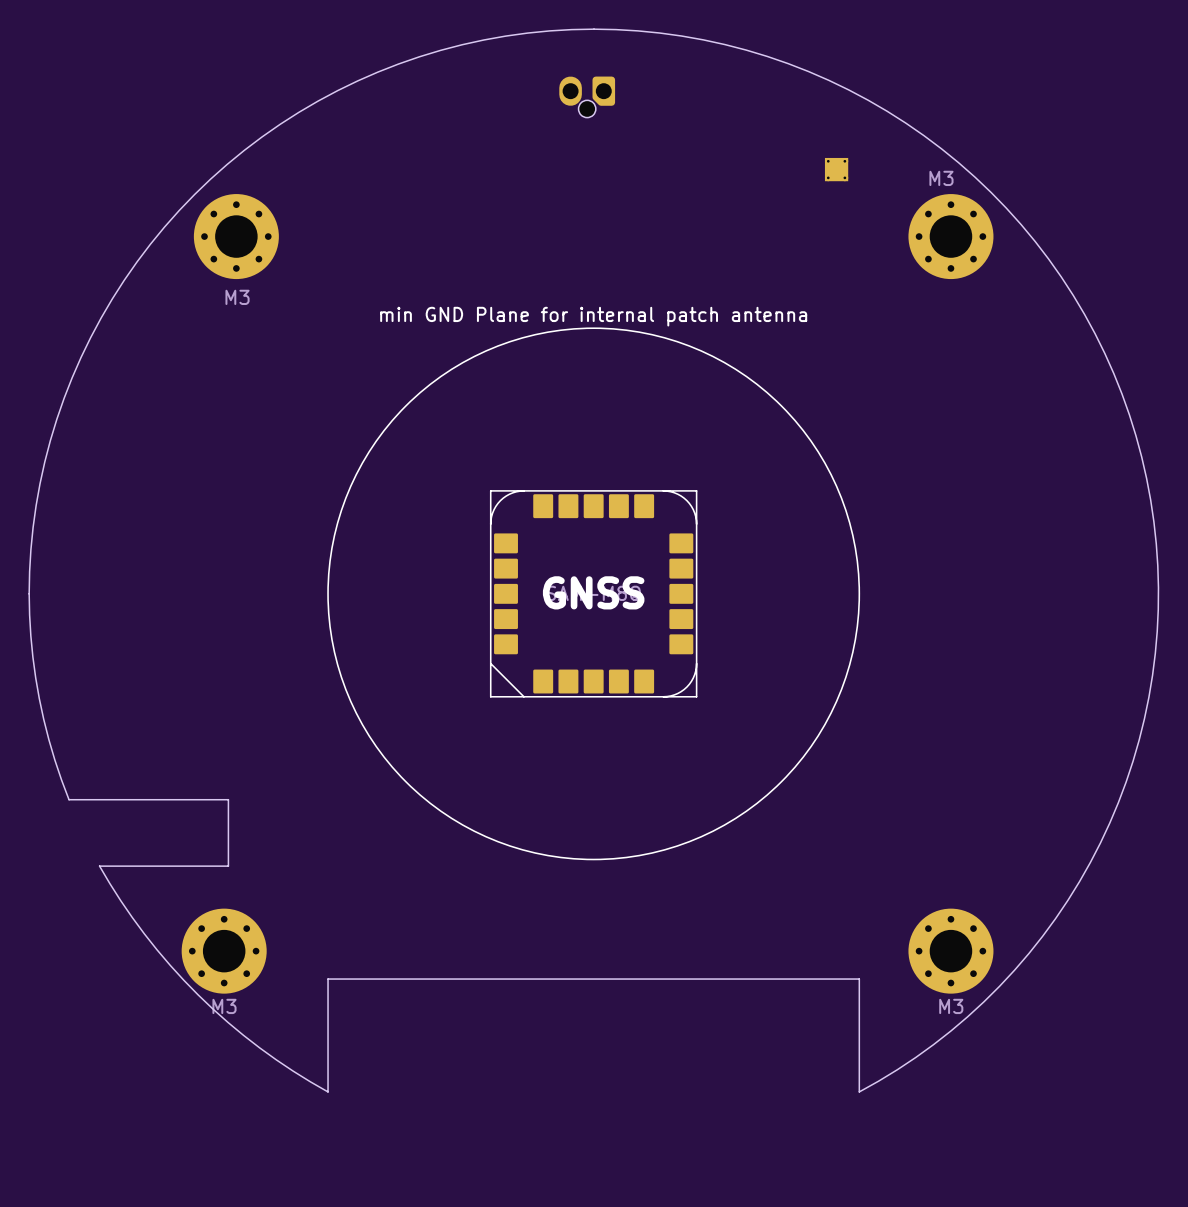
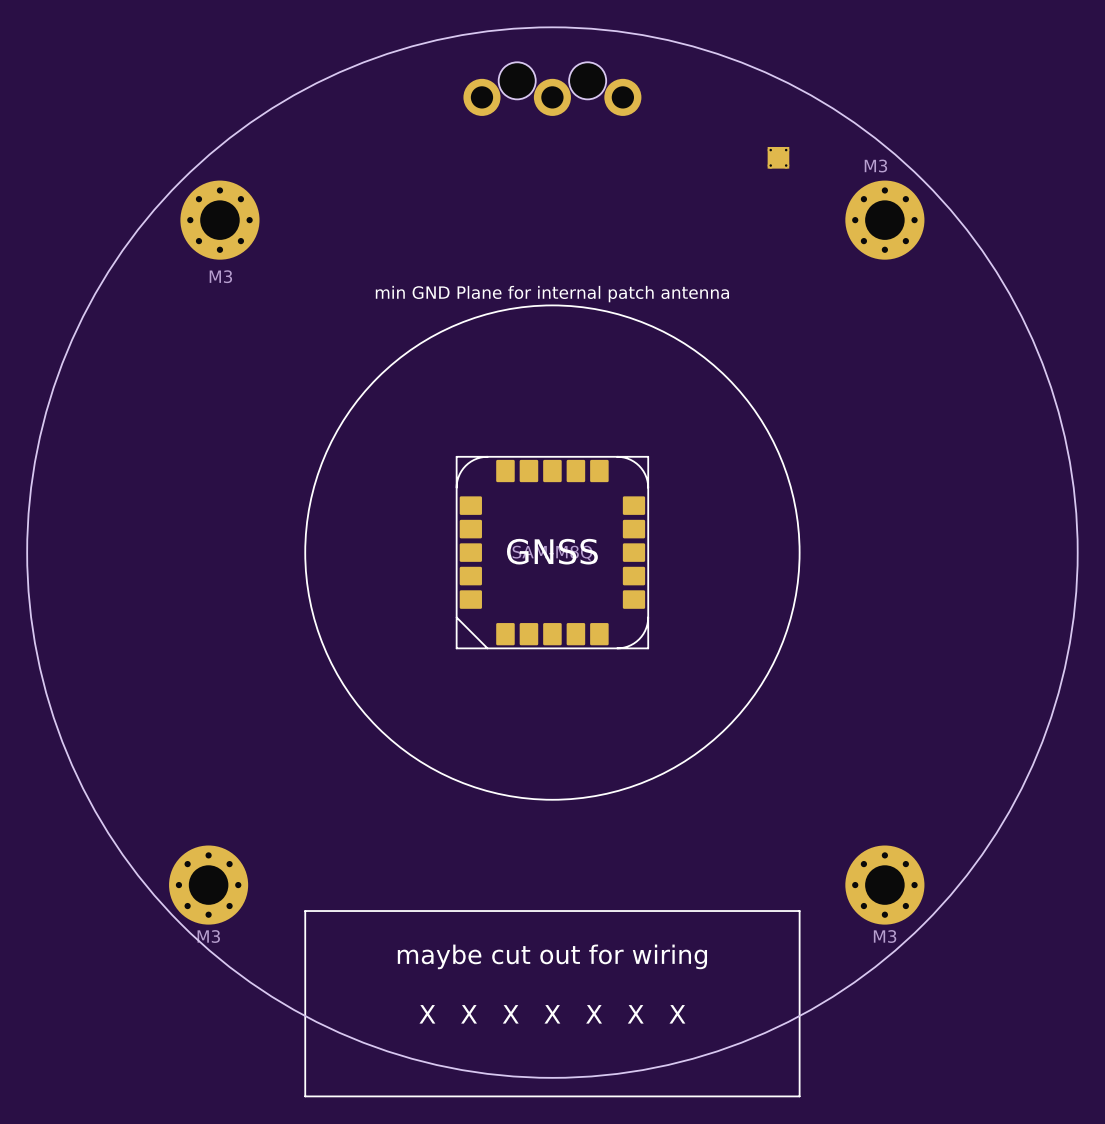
round board edge: none -> [26, 27, 1079, 1079]
board edge: (594, 29) (549, 30) (505, 36) (462, 44) (419, 56) (377, 72) (318, 101) (280, 124) (244, 150) (210, 179) (179, 210) (150, 244) (124, 280) (101, 317) (72, 377) (56, 419) (44, 462) (36, 505) (30, 549) (29, 593) (30, 635) (35, 677) (43, 719) (54, 759) (69, 799) (228, 799) (228, 866) (99, 866) (144, 933) (198, 994) (259, 1047) (328, 1091) (328, 979) (859, 979) (859, 1091) (897, 1069) (950, 1031) (999, 986) (1028, 953) (1067, 900) (1100, 842) (1118, 802) (1139, 740) (1152, 675) (1158, 609) (1156, 543) (1146, 478) (1129, 414) (1104, 353) (1073, 295) (1035, 241) (991, 192) (958, 162) (905, 123) (848, 89) (788, 63) (724, 44) (659, 33) (594, 29) -> none
part footprint: [559, 76, 616, 118] -> [463, 62, 642, 116]
line: none -> (305, 911) (799, 911) (799, 1096) (305, 1096) (305, 911)
text: none -> maybe cut out for wiring (552, 956)
text: none -> X X X X X X X (552, 1014)

